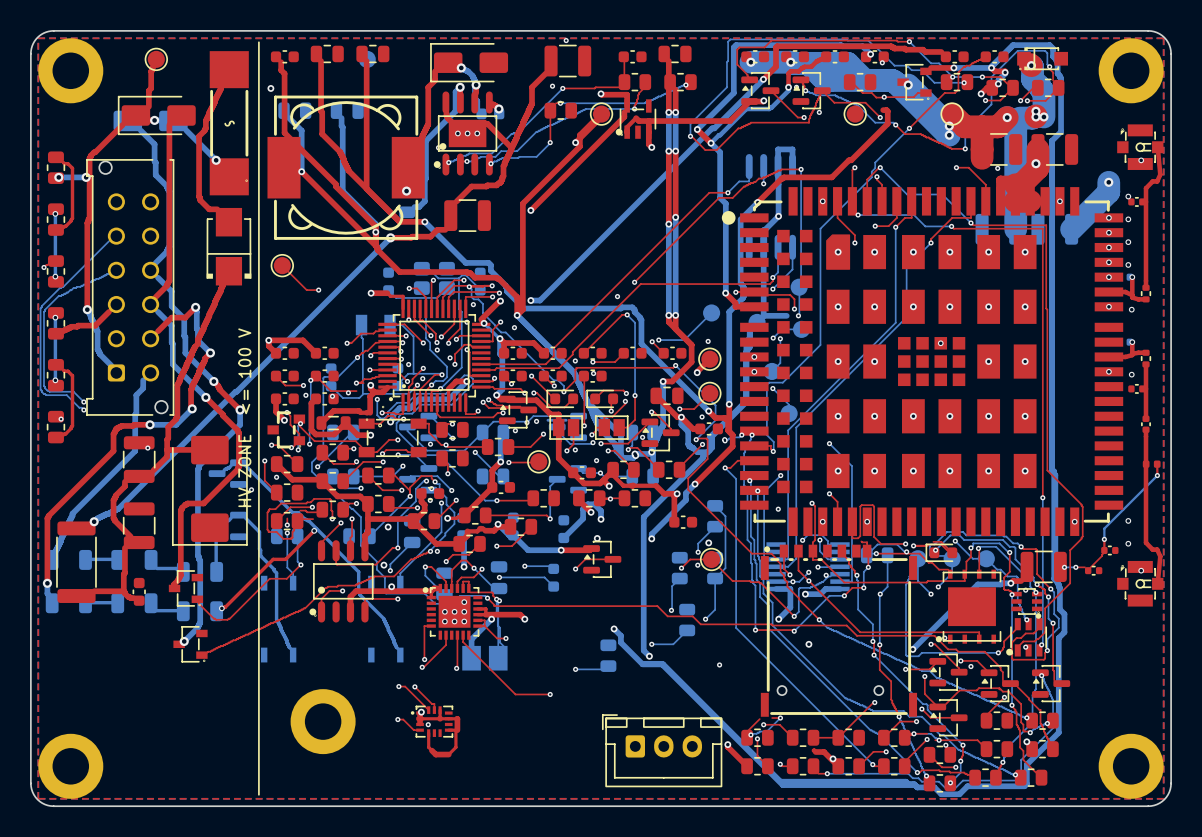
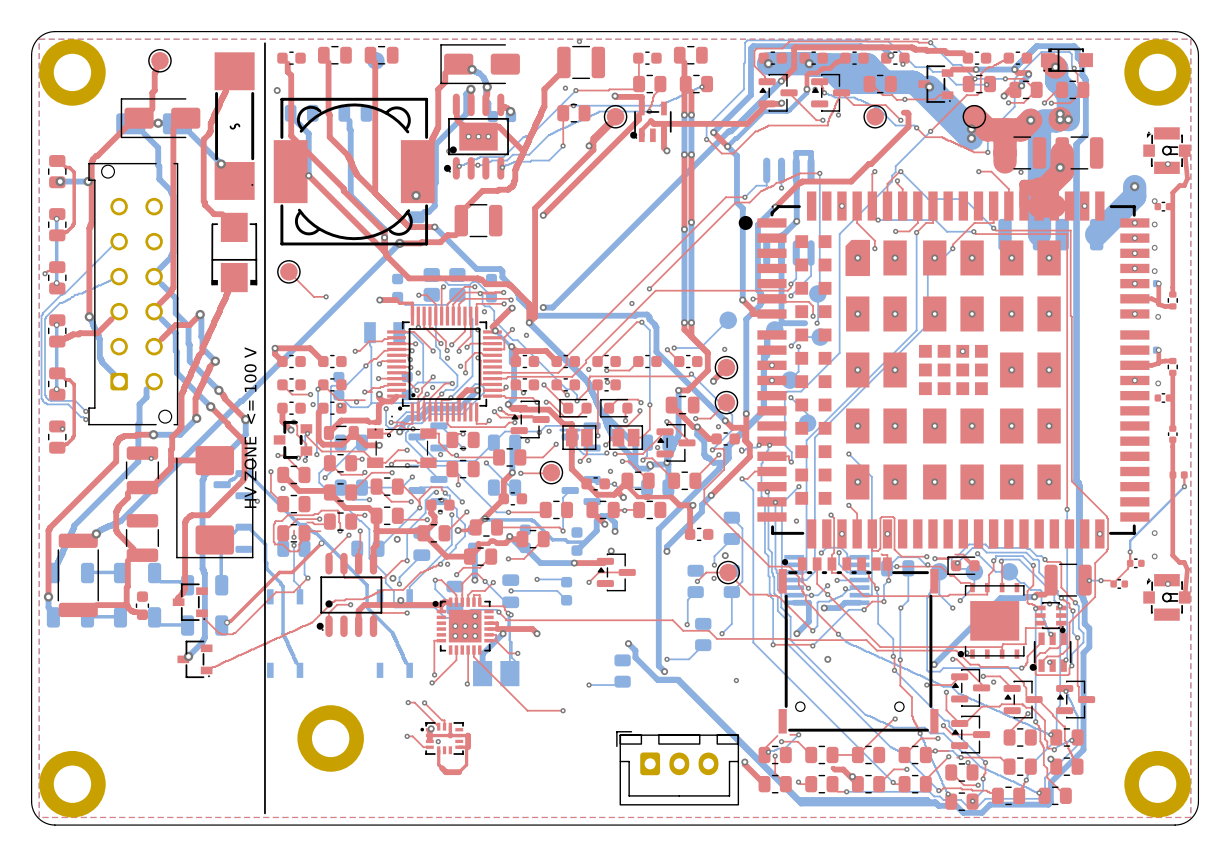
bottom track: none -> (484, 518) (531, 519) (552, 539) (584, 542)
via: none -> (484, 518)
top track: none -> (1061, 623) (1061, 628) (1025, 628) (1025, 644) (1003, 644) (1002, 647)

